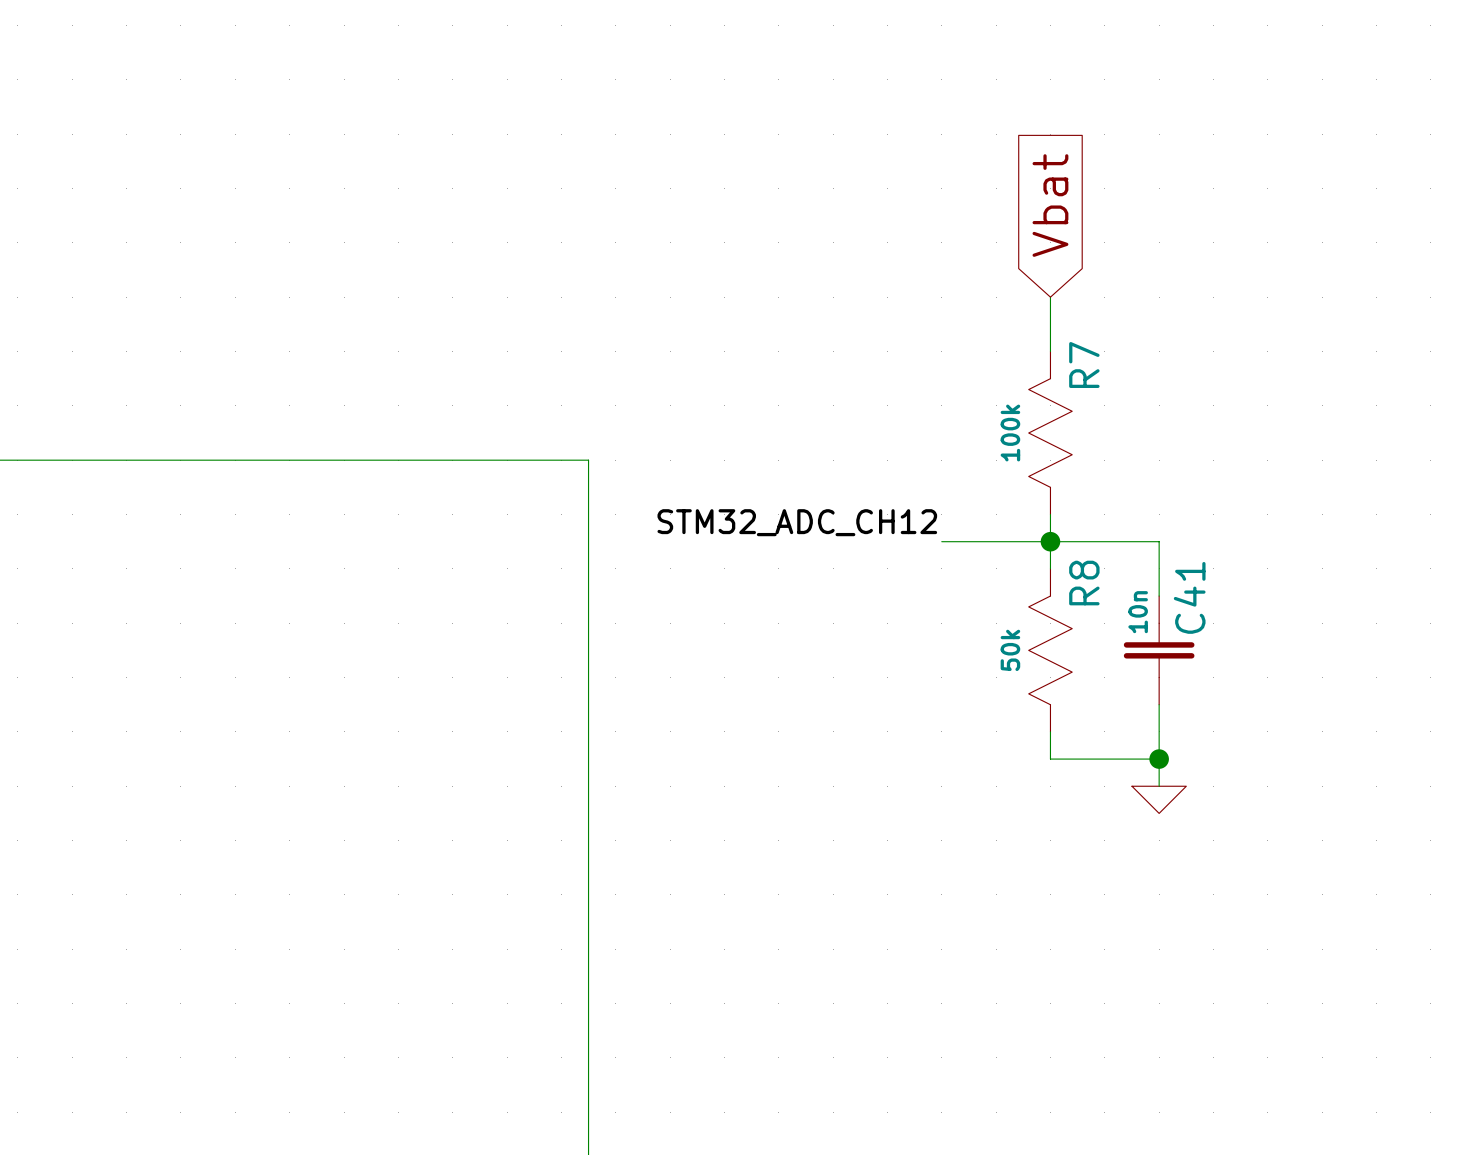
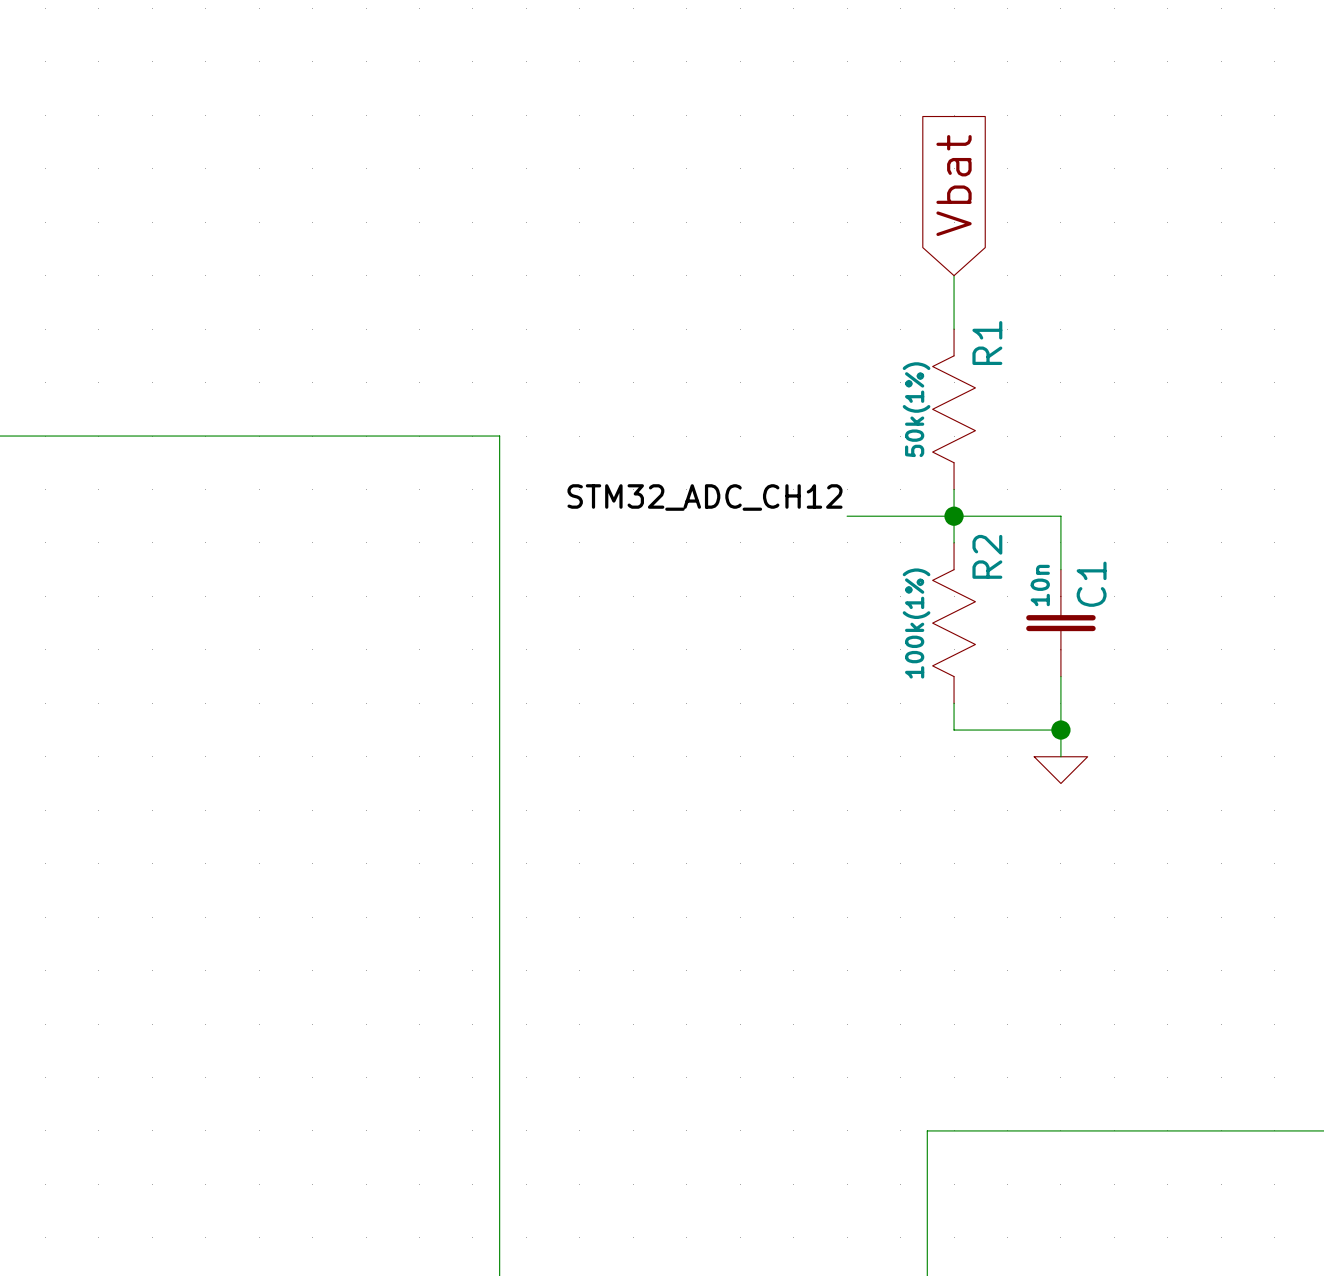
R7 name: R7 (1084, 365) -> R1 (987, 343)
R7 value: 100k (1010, 433) -> 50k(1%) (916, 409)
R8 name: R8 (1084, 583) -> R2 (987, 556)
C41 name: C41 (1189, 597) -> C1 (1091, 584)
R8 value: 50k (1010, 650) -> 100k(1%) (916, 623)

